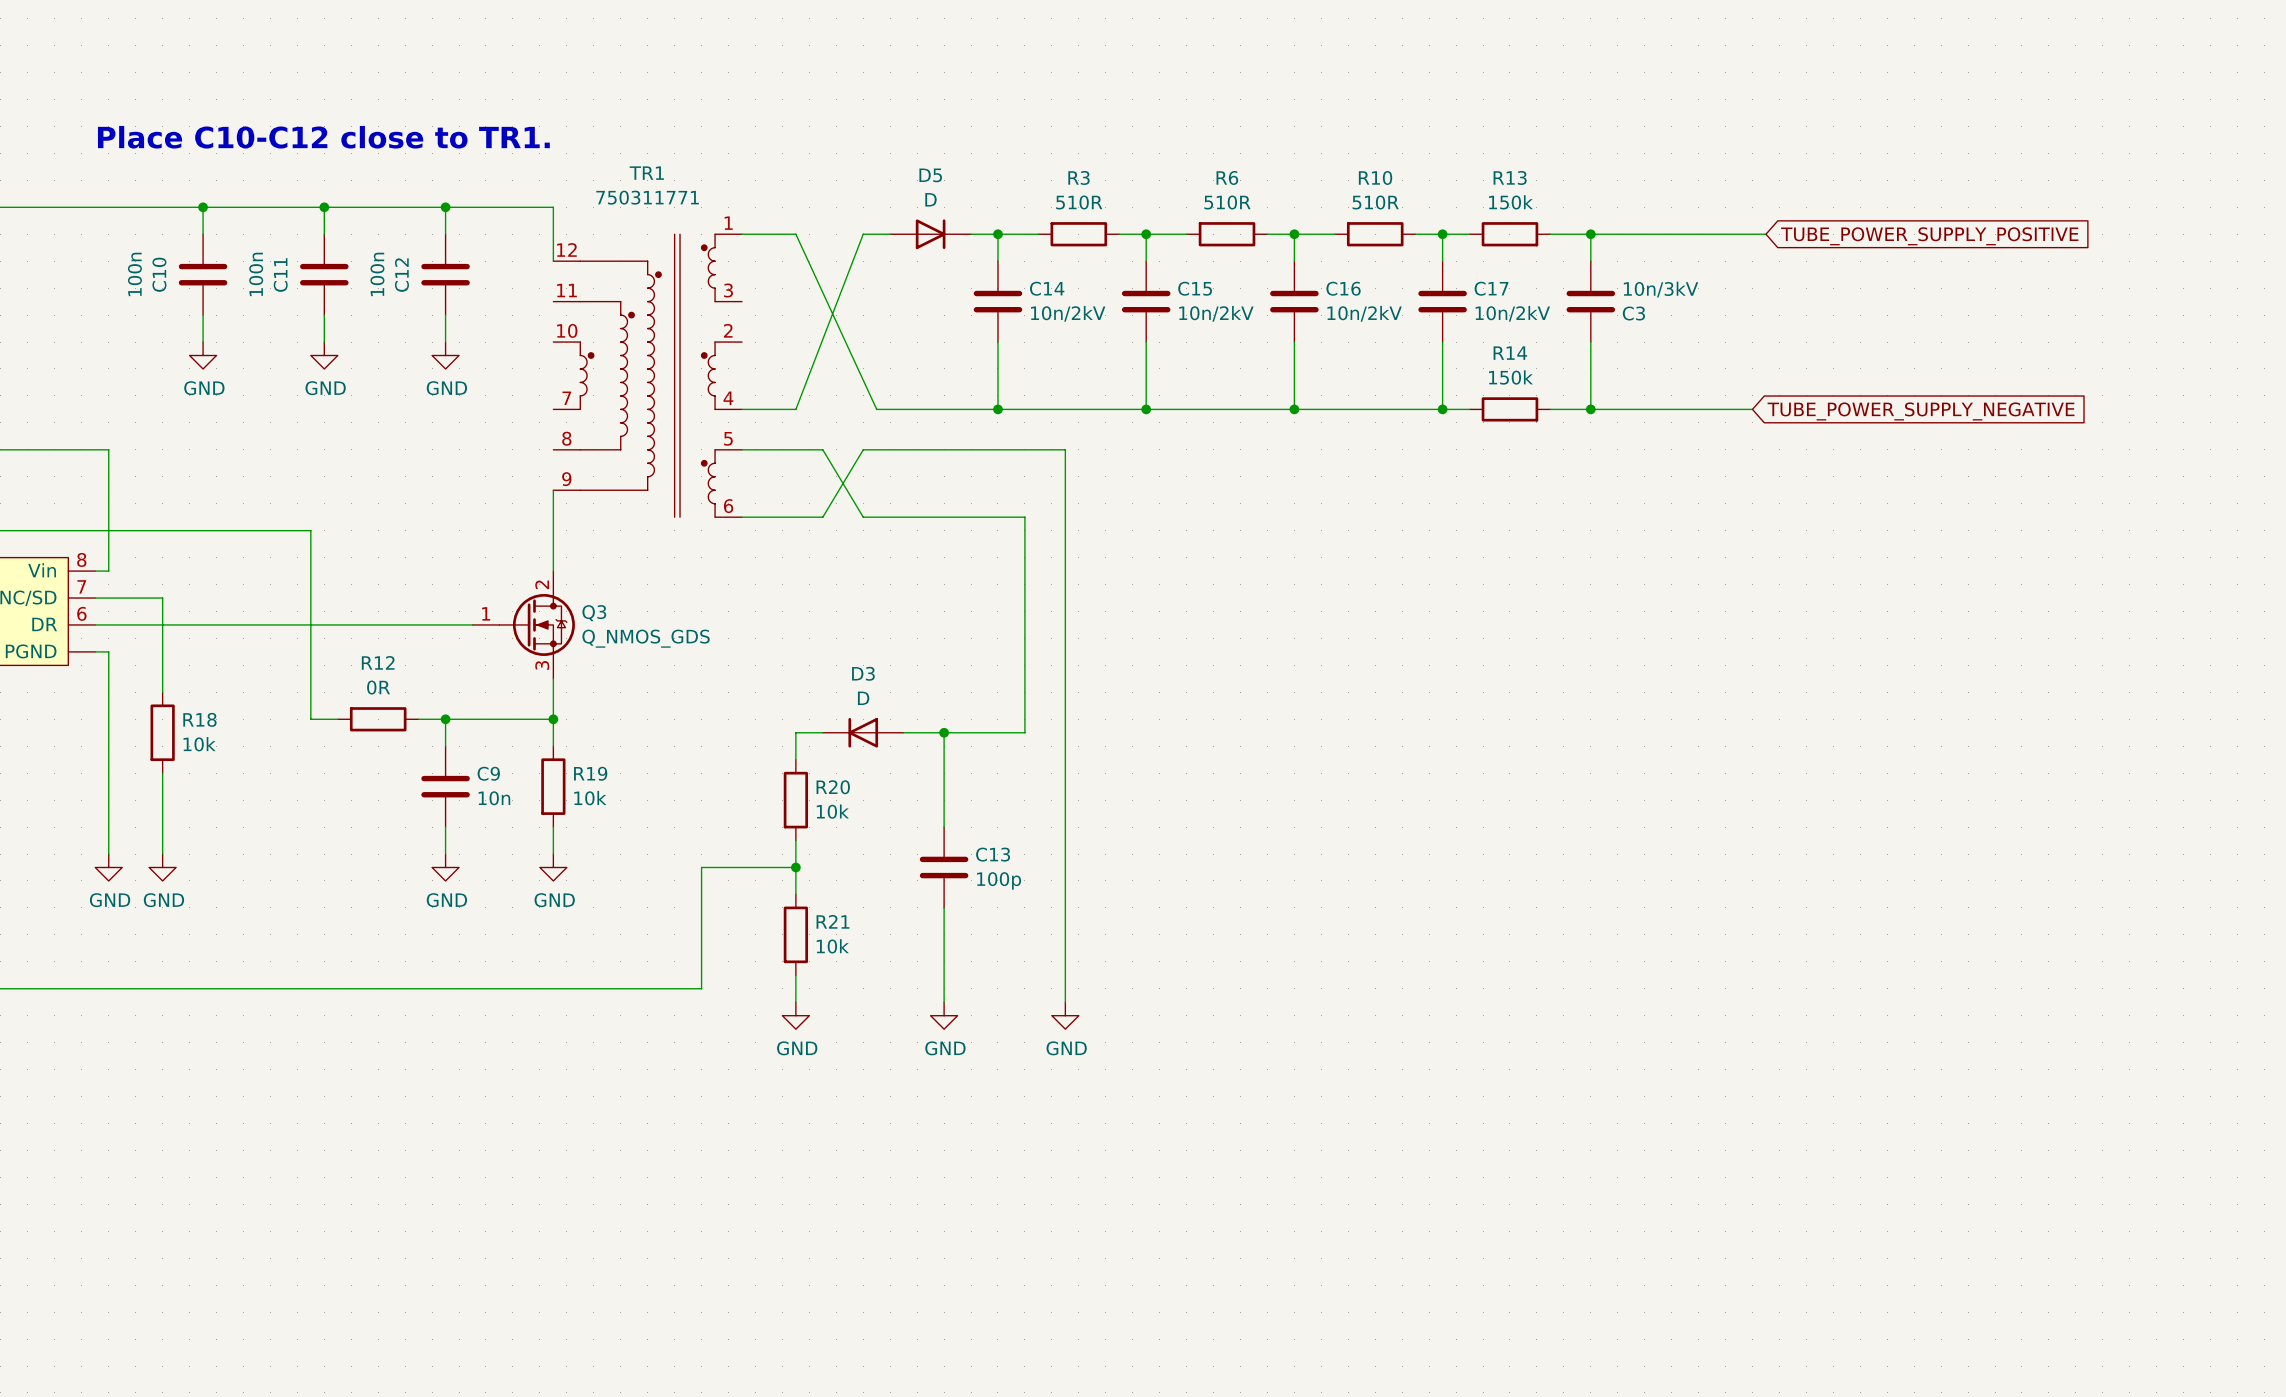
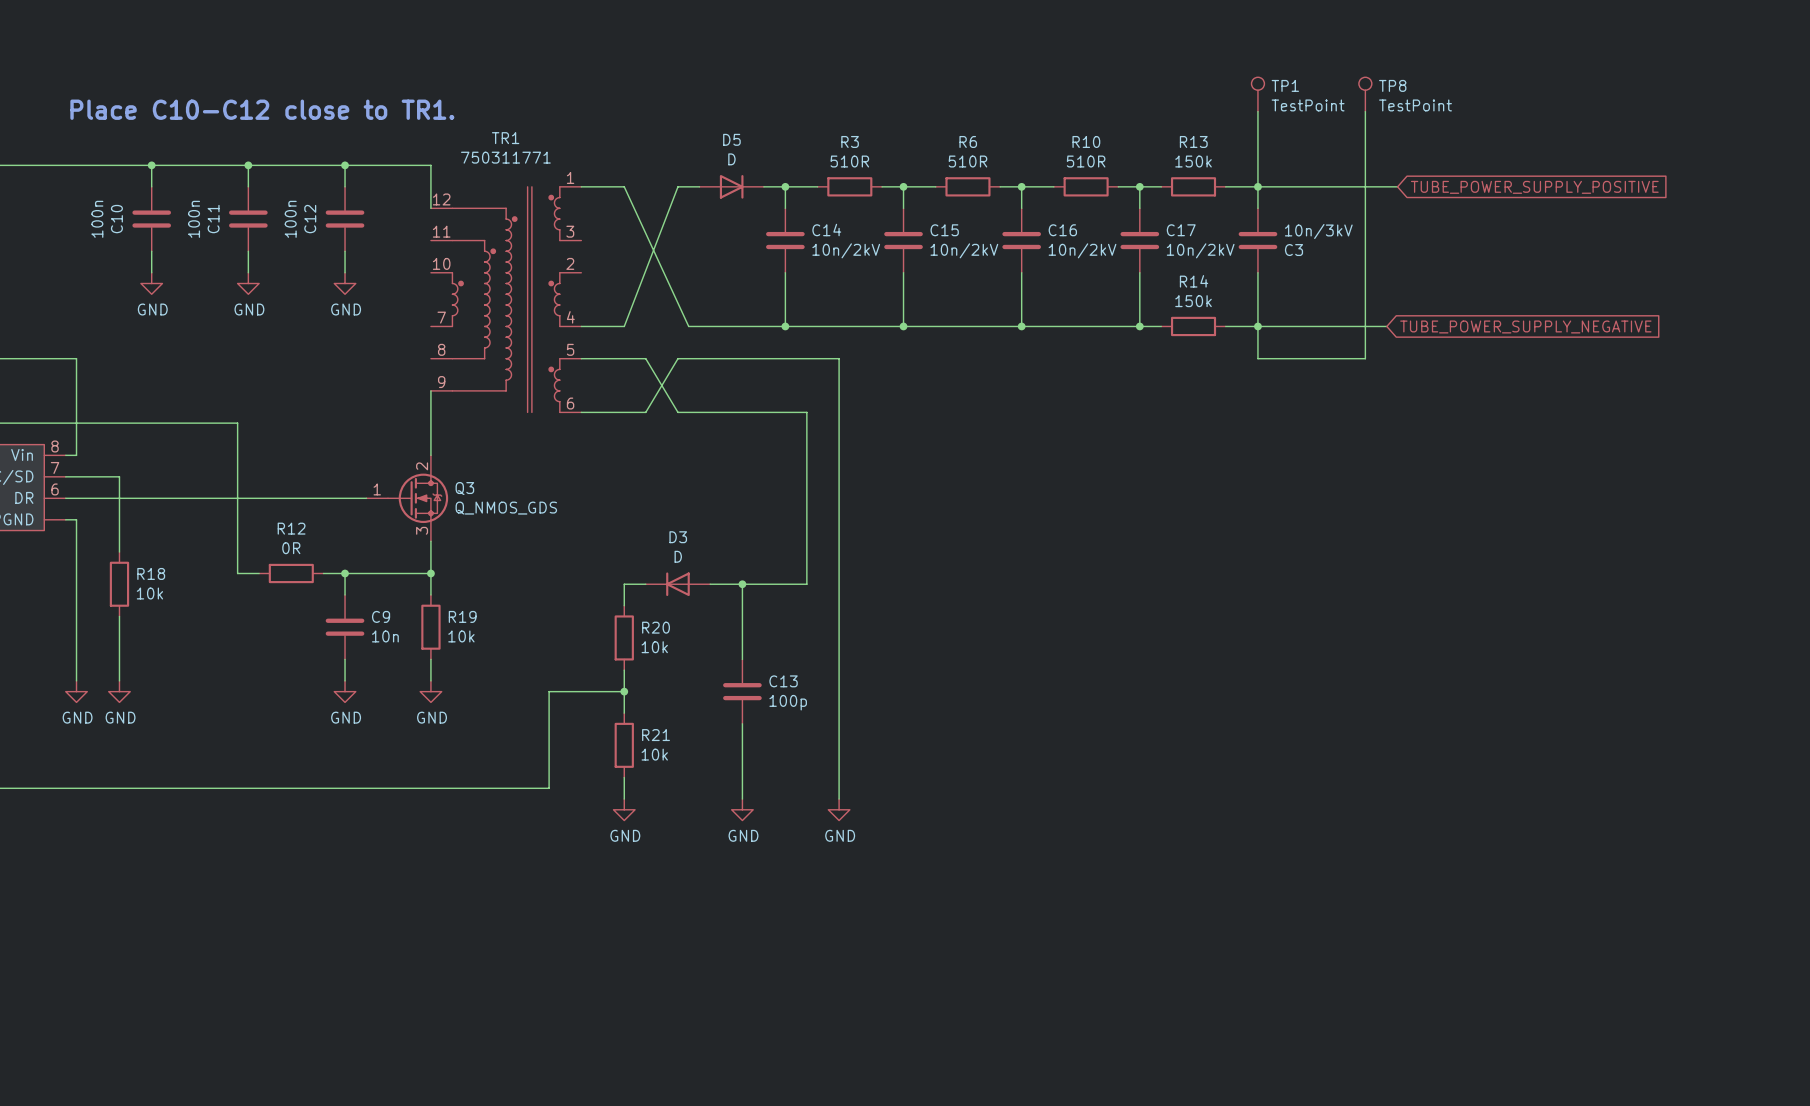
TP1: none -> TestPoint (1257, 94)
TP8: none -> TestPoint (1365, 94)
wire: none -> (1257, 111) (1257, 186)
wire: none -> (1365, 111) (1365, 358) (1257, 358) (1257, 326)

